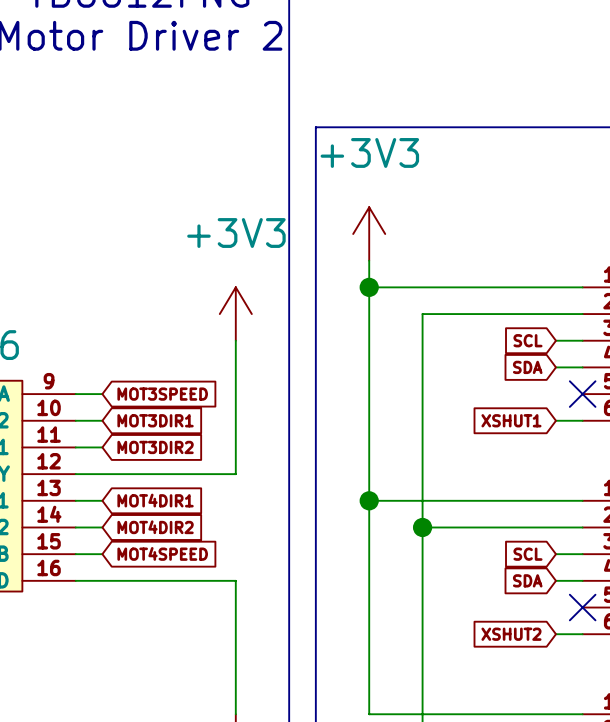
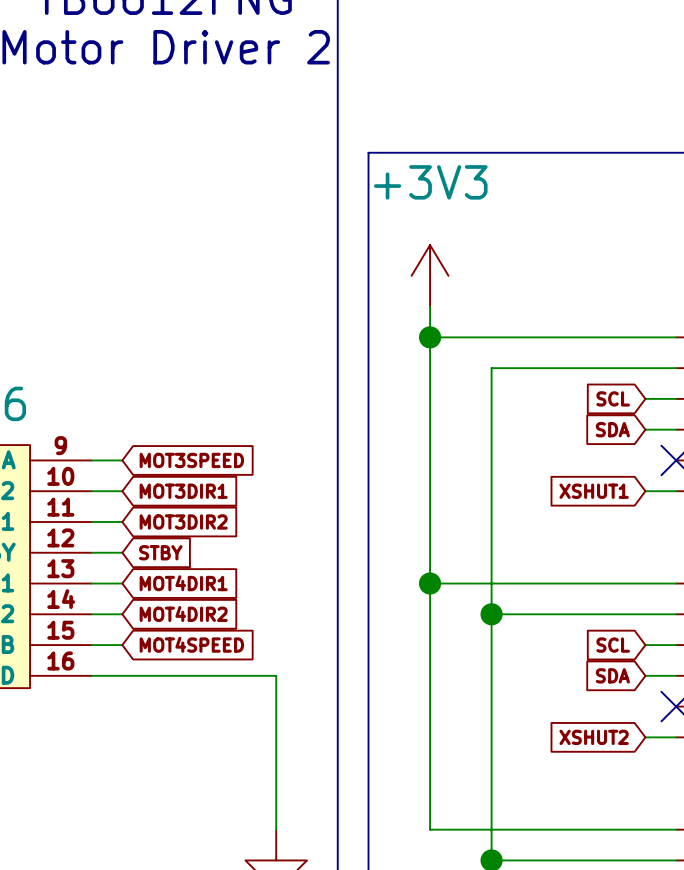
power symbol: +3V3 (235, 314) -> none
wire: (235, 340) (235, 474) (102, 474) -> none
global label: none -> STBY (160, 552)

